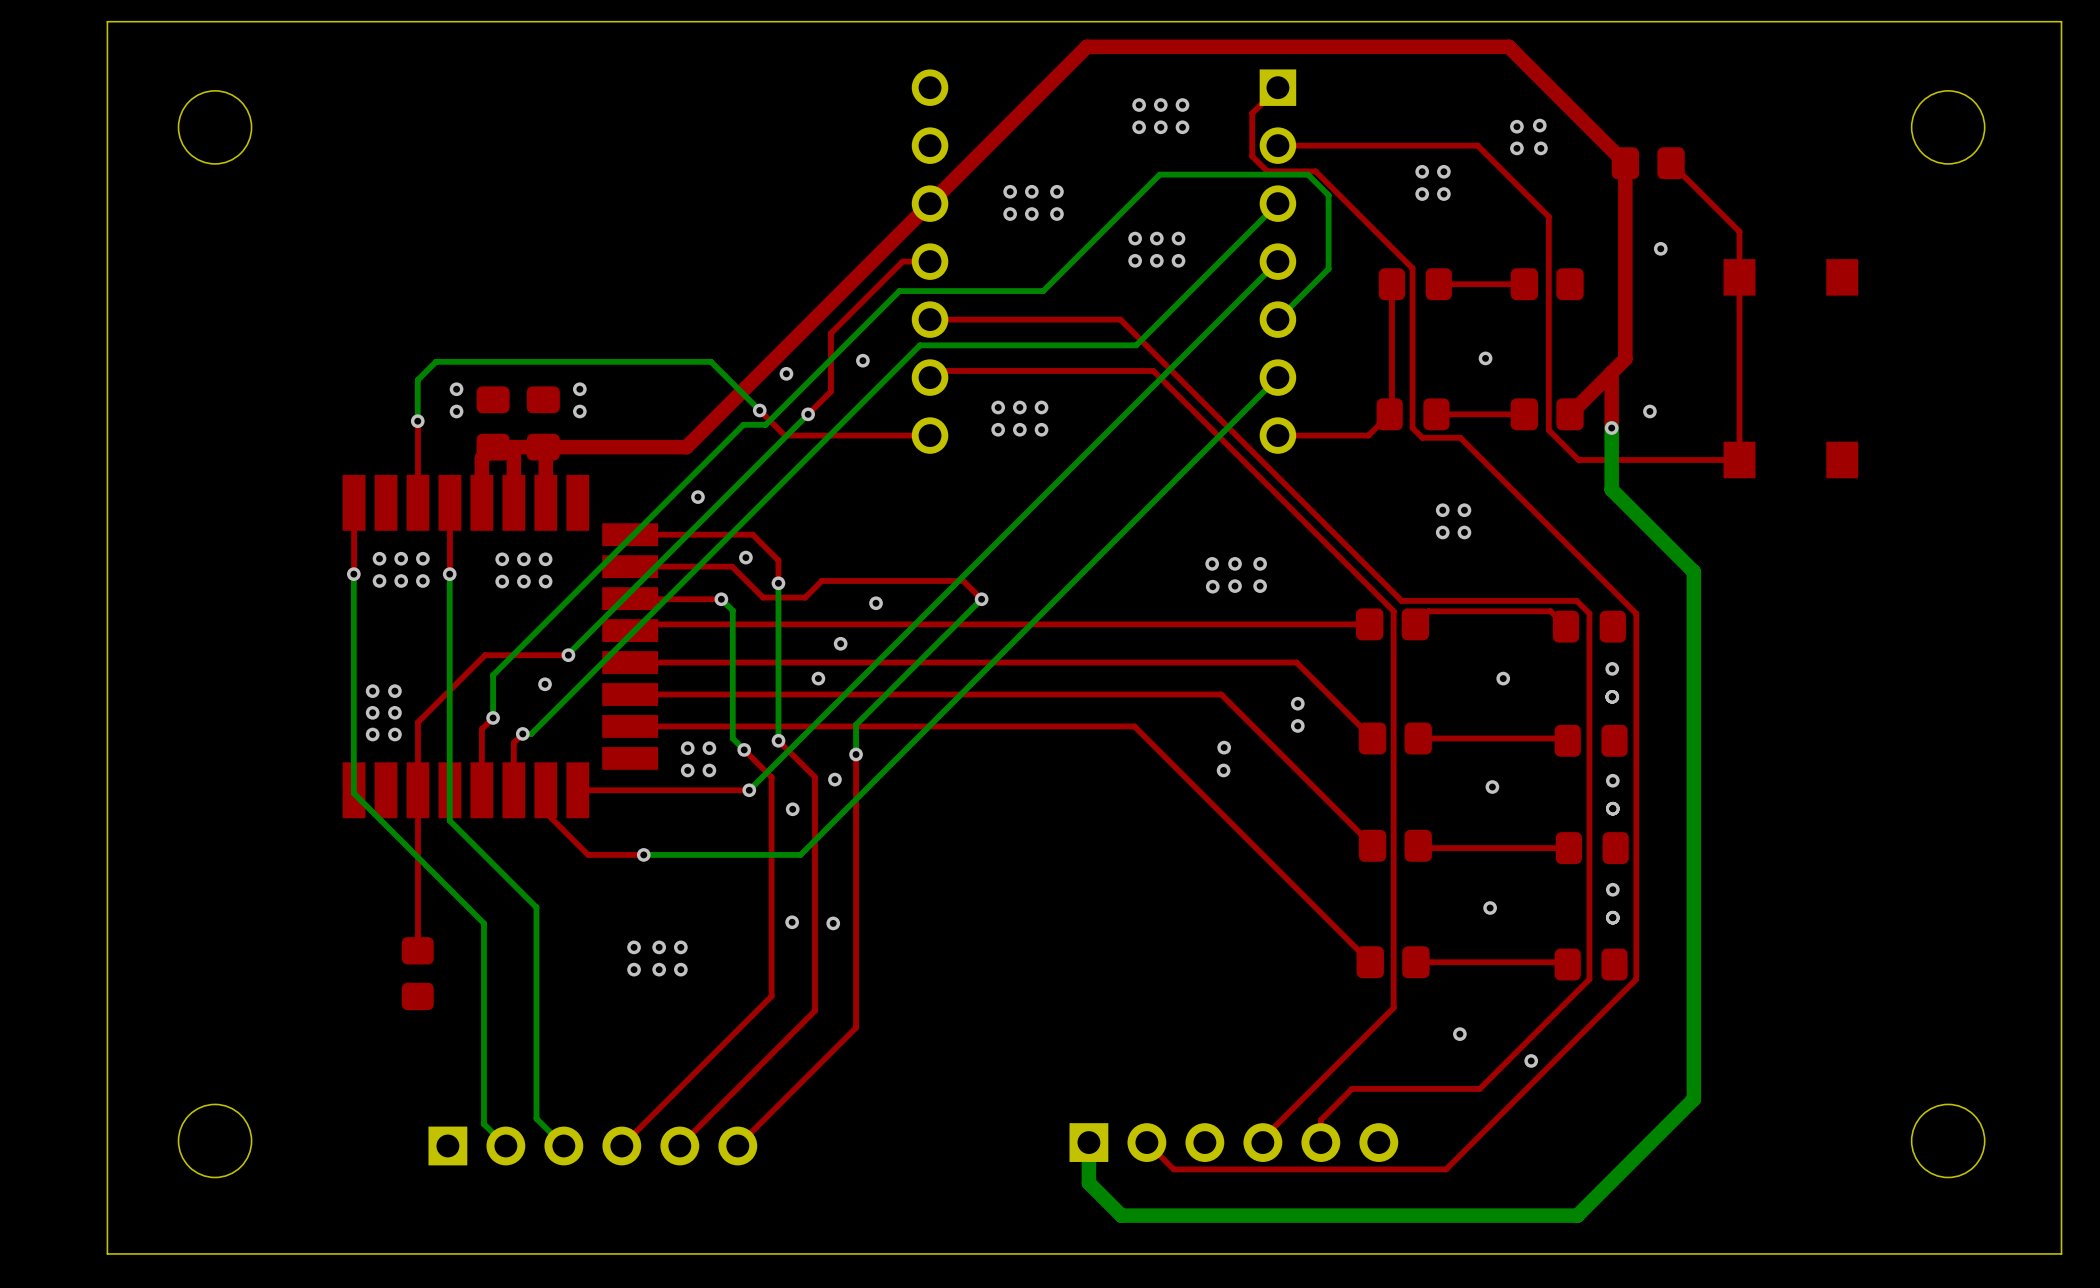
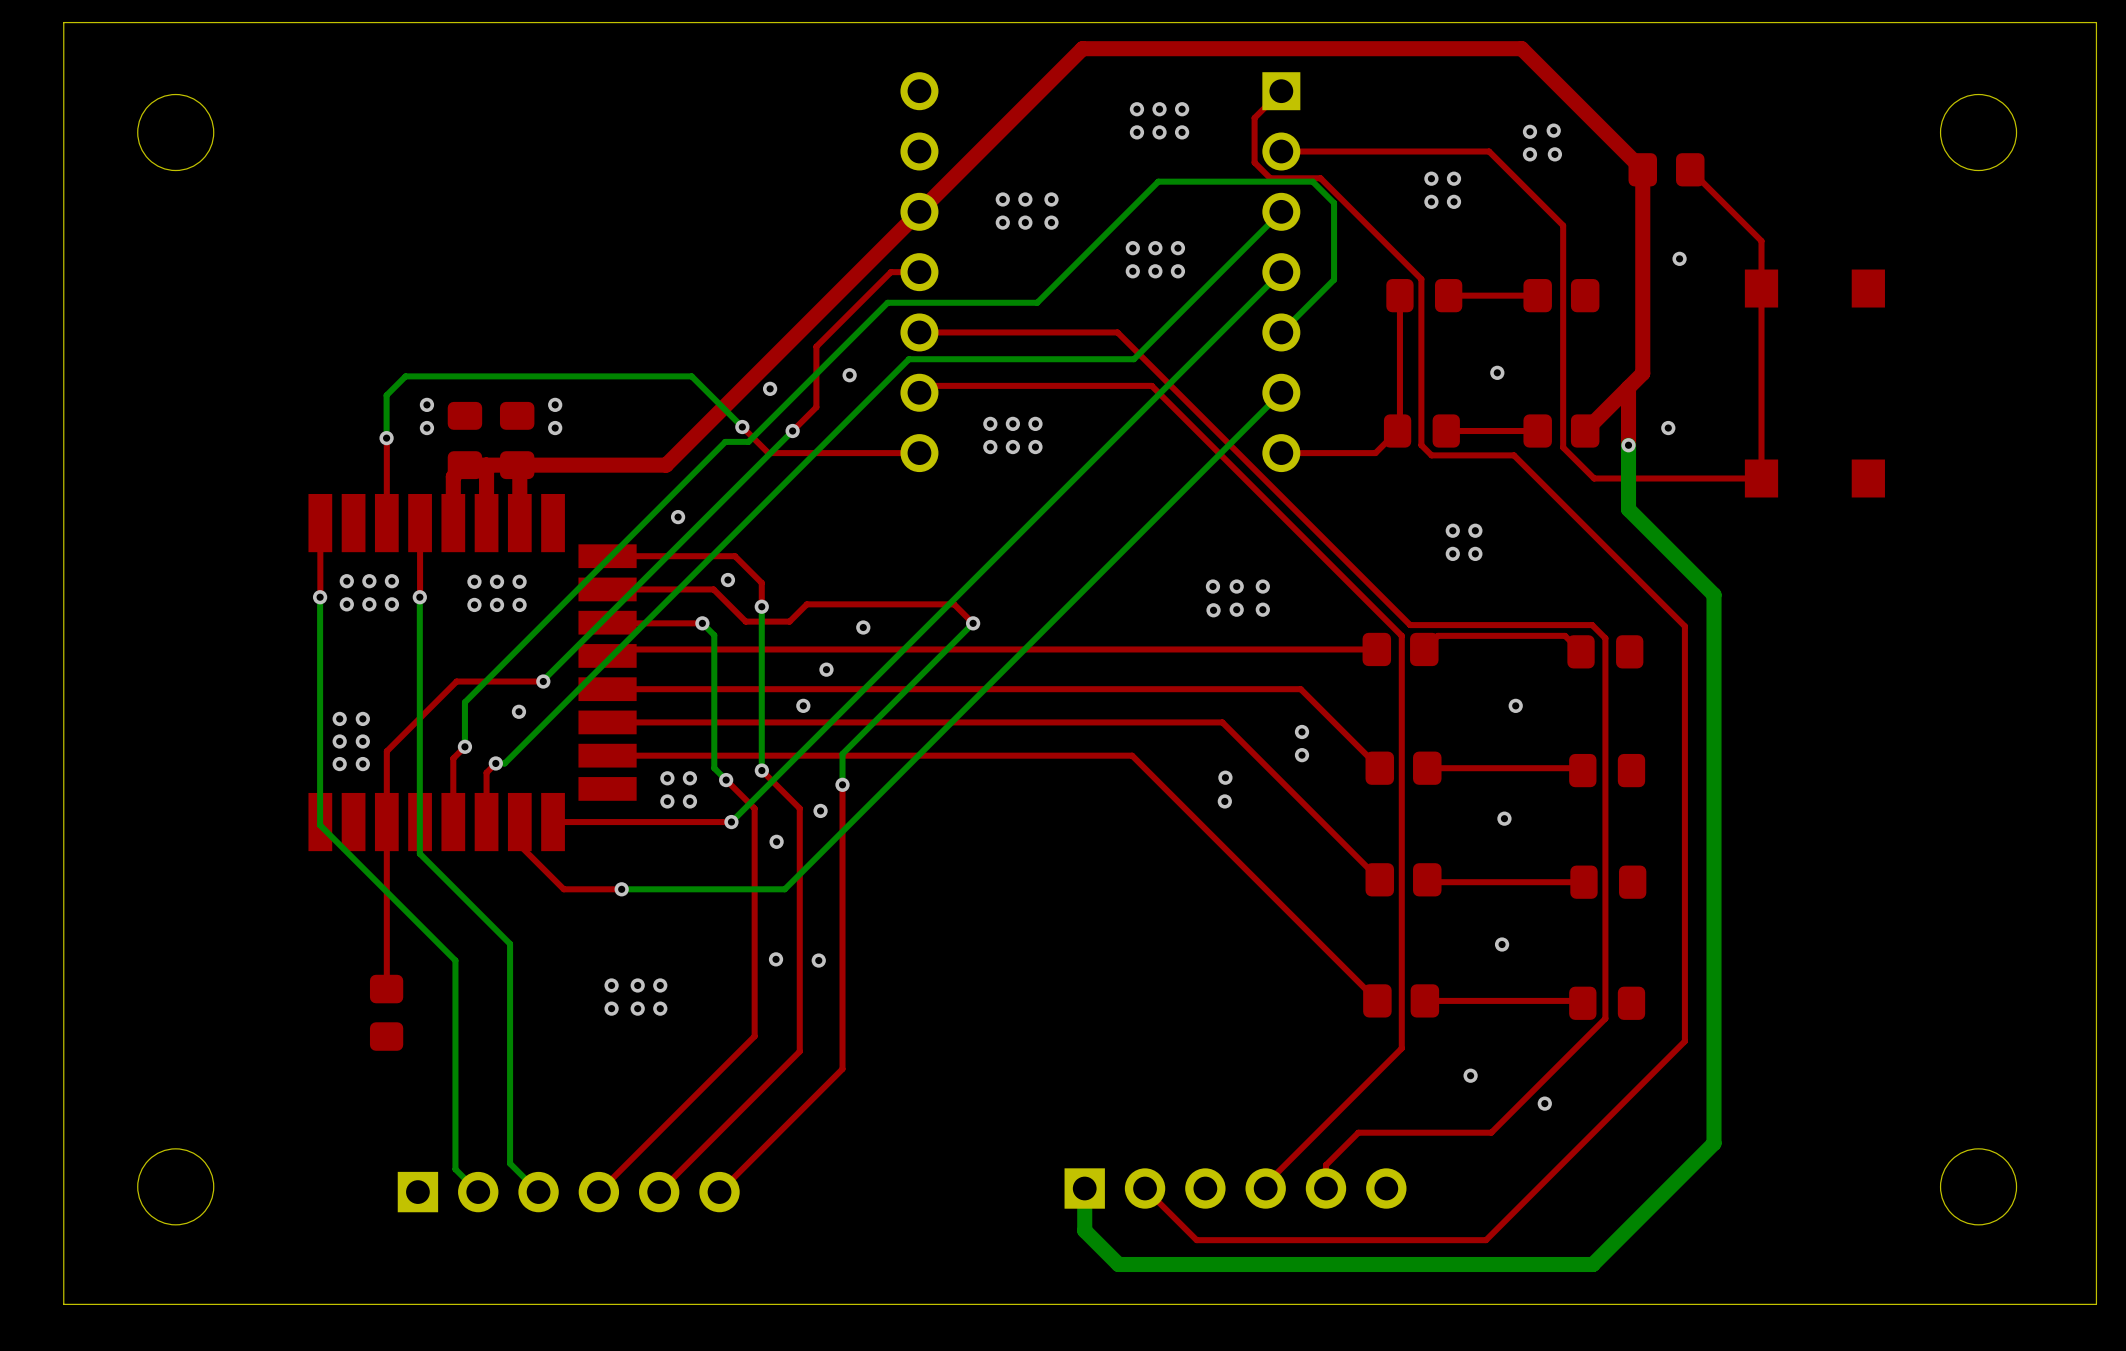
top track: (1460, 437) (1636, 613) (1636, 979) (1446, 1169) (1173, 1169) -> (1471, 455) (1513, 455) (1684, 626) (1684, 1041) (1486, 1240) (1196, 1240) (1172, 1216)
via: (1612, 668) -> none
via: (1612, 696) -> none
via: (1612, 780) -> none
via: (1612, 808) -> none
via: (1612, 889) -> none
via: (1612, 917) -> none

